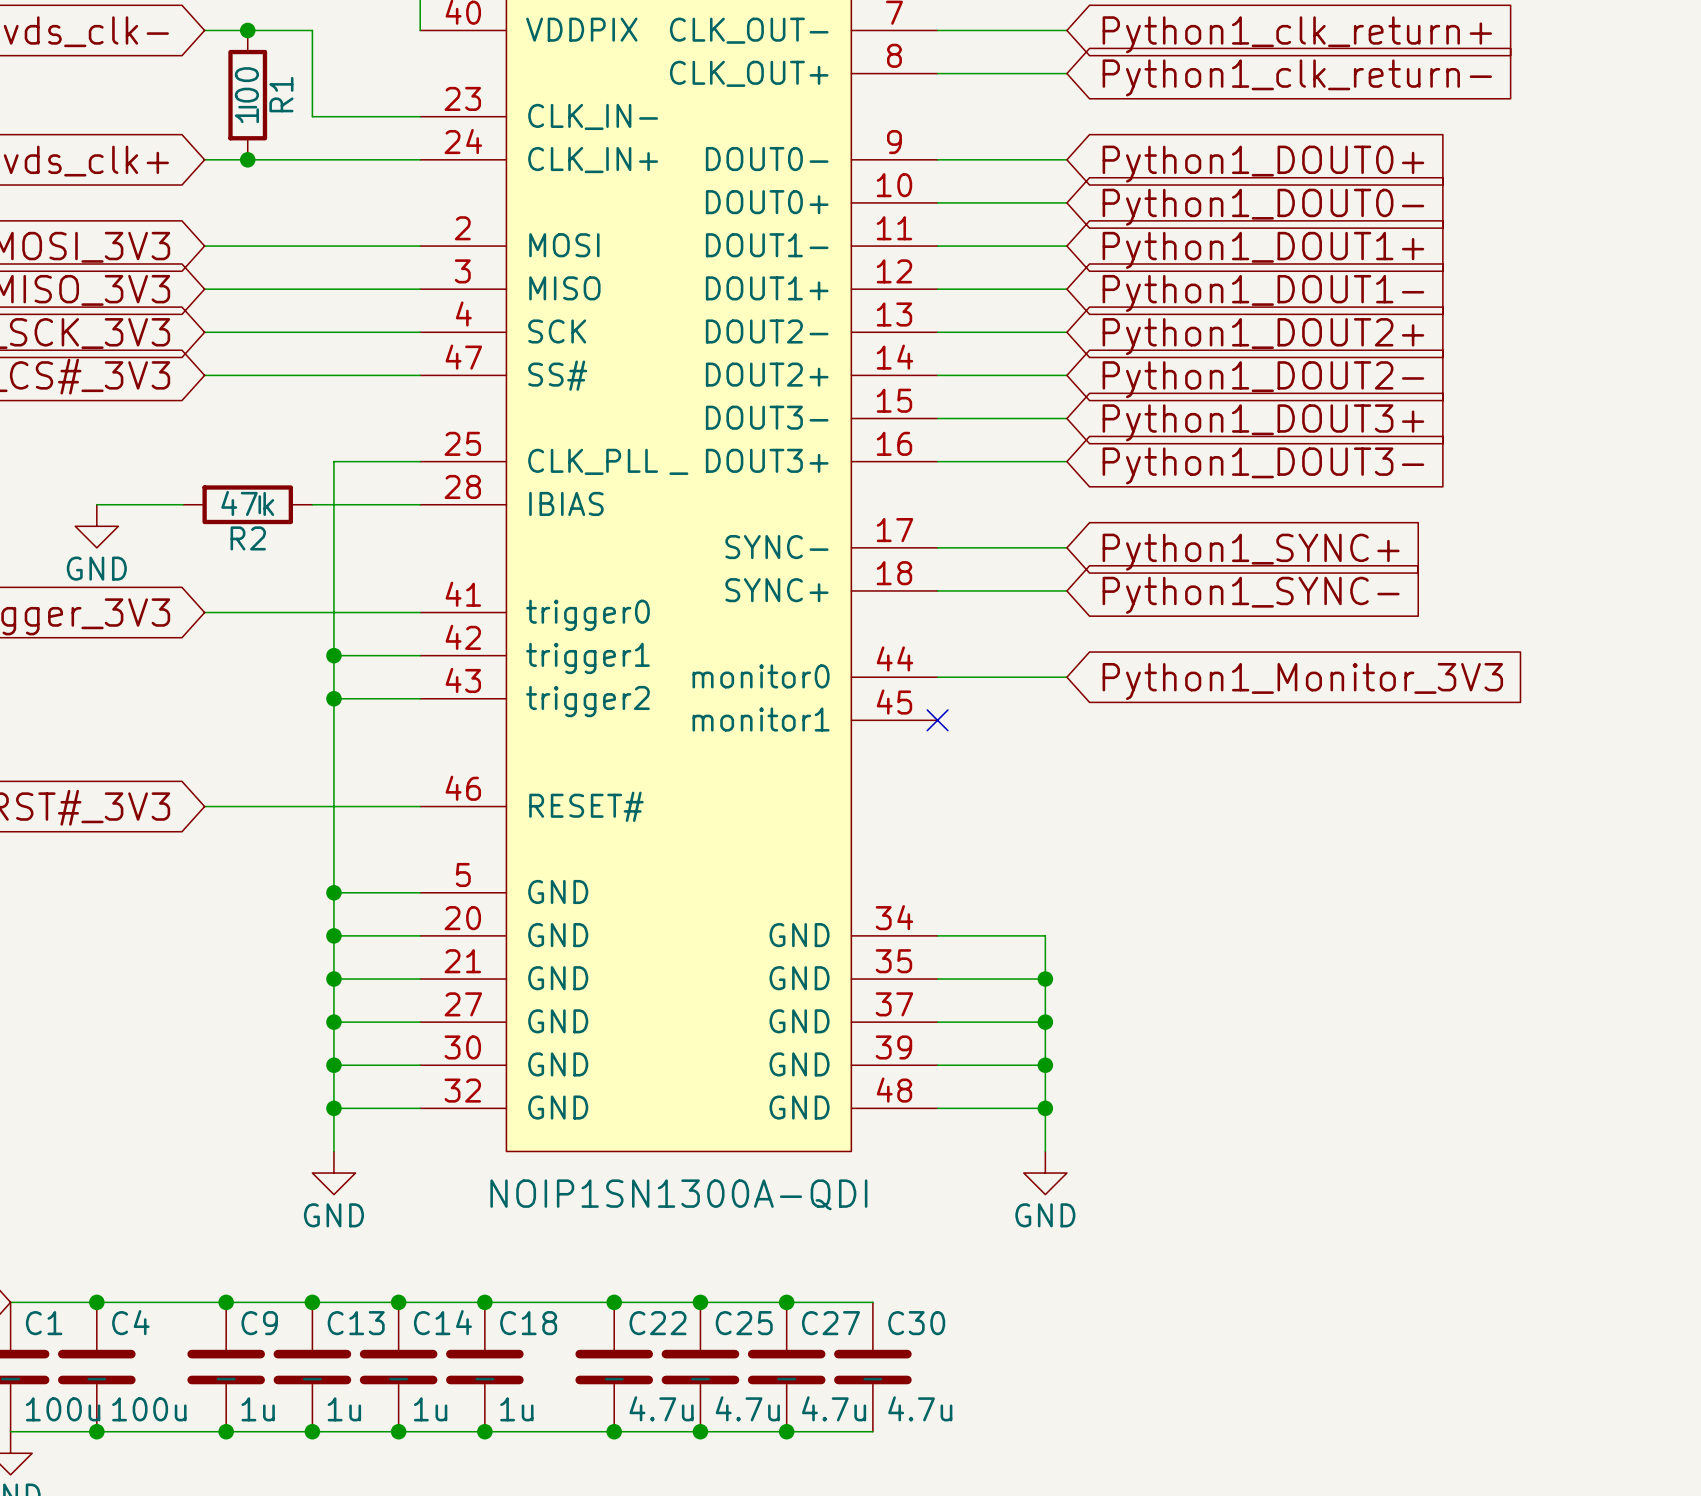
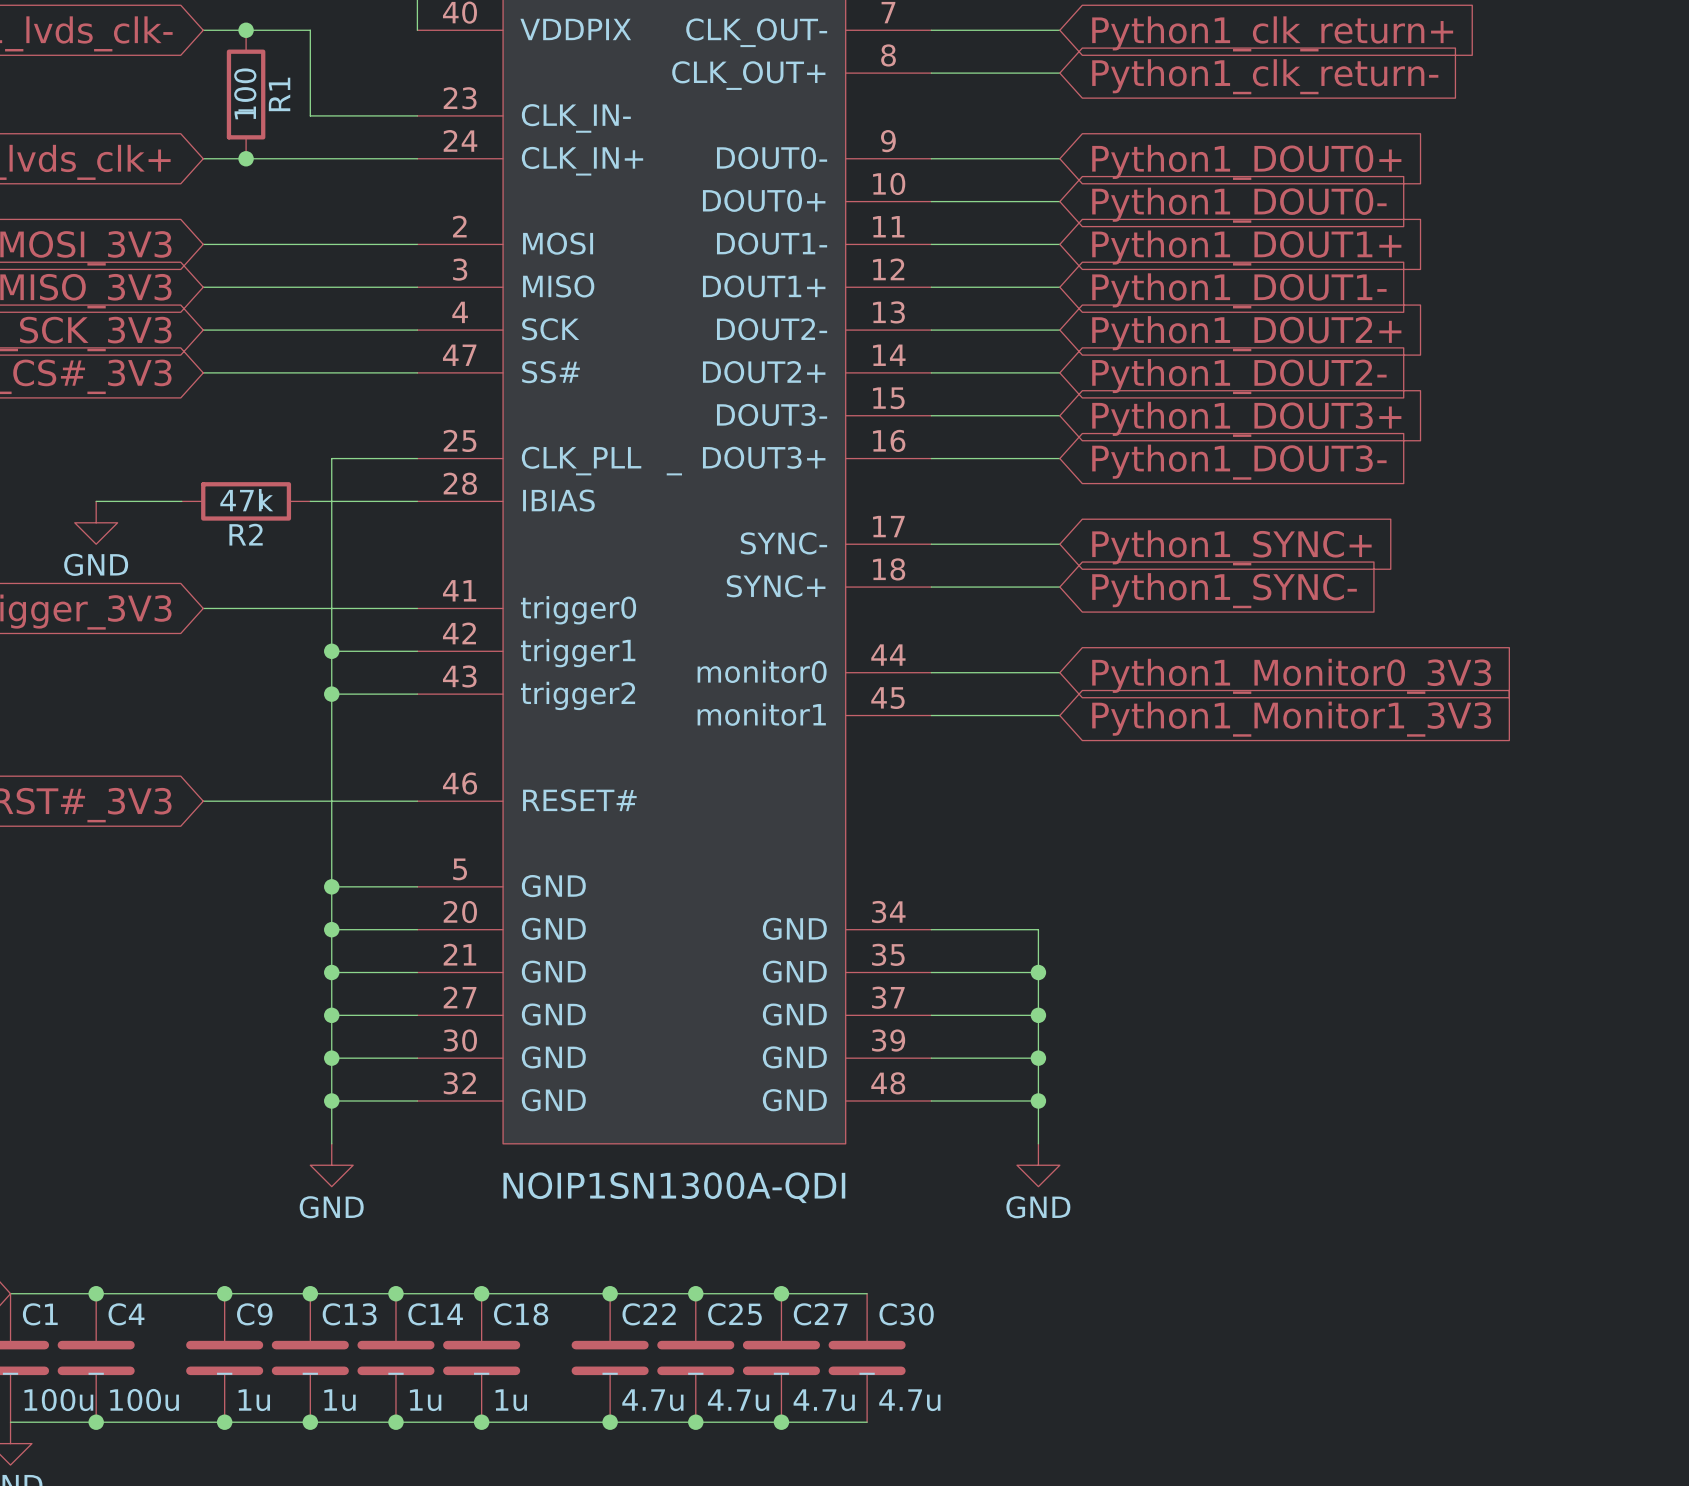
global label: Python1_Monitor_3V3 (1302, 681) -> Python1_Monitor0_3V3 (1291, 676)
wire: none -> (931, 715) (1059, 715)
no-connect mark: (937, 720) -> none
global label: none -> Python1_Monitor1_3V3 (1291, 719)

